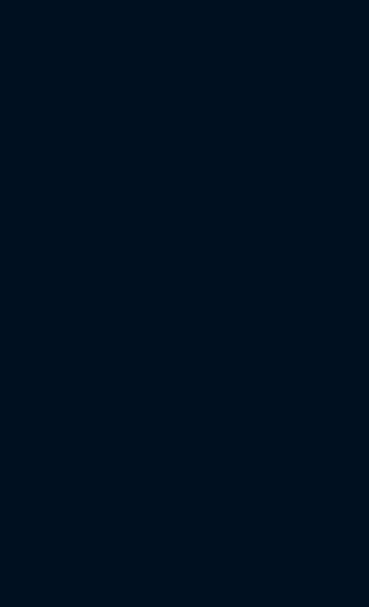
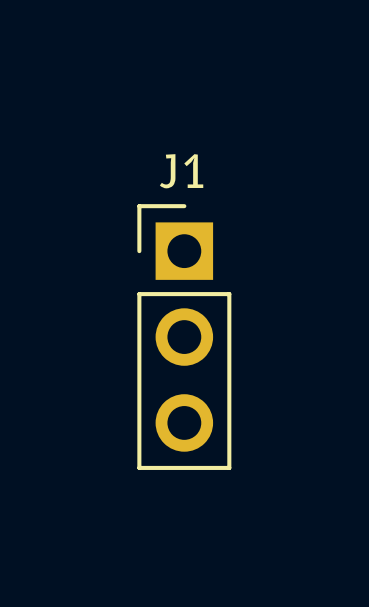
J1: none -> (184, 337)

